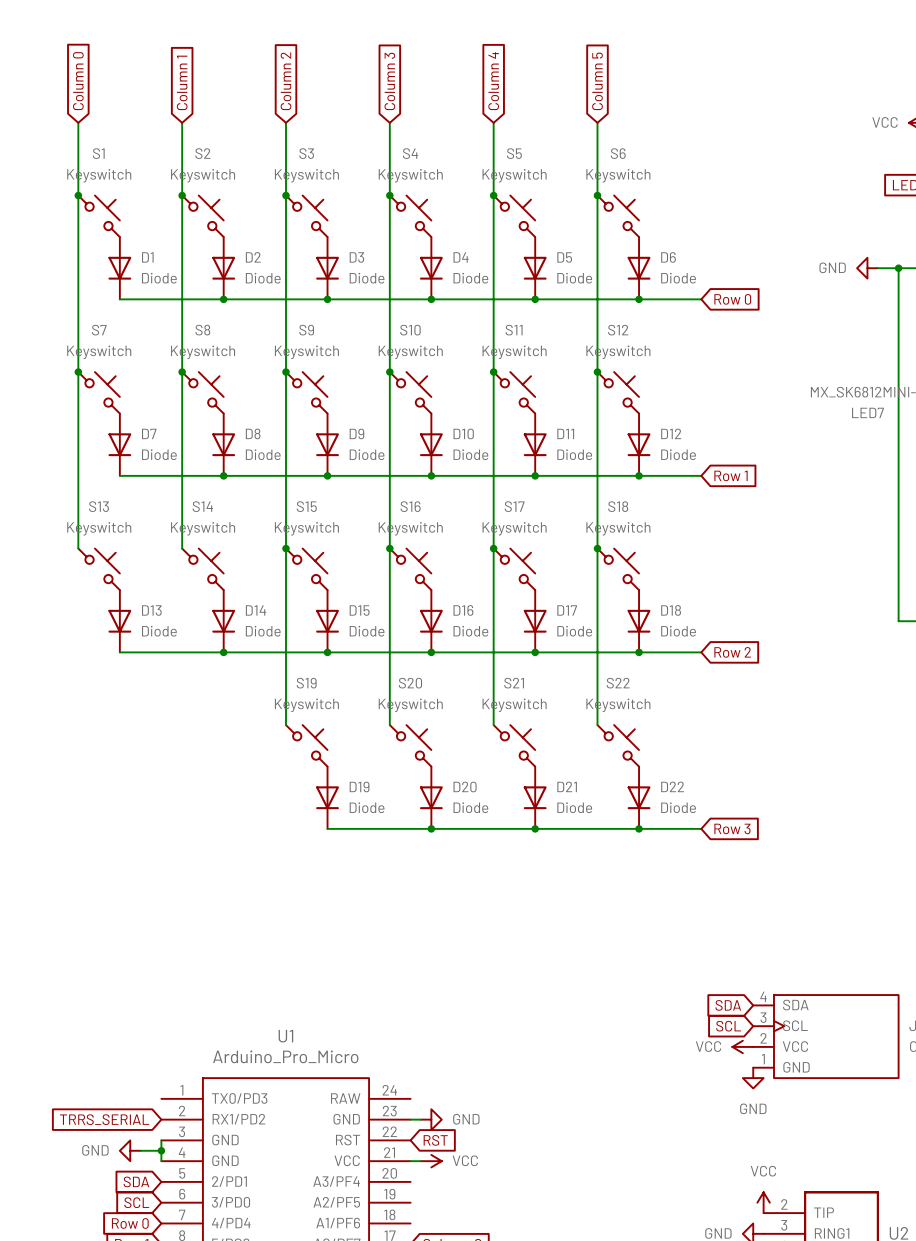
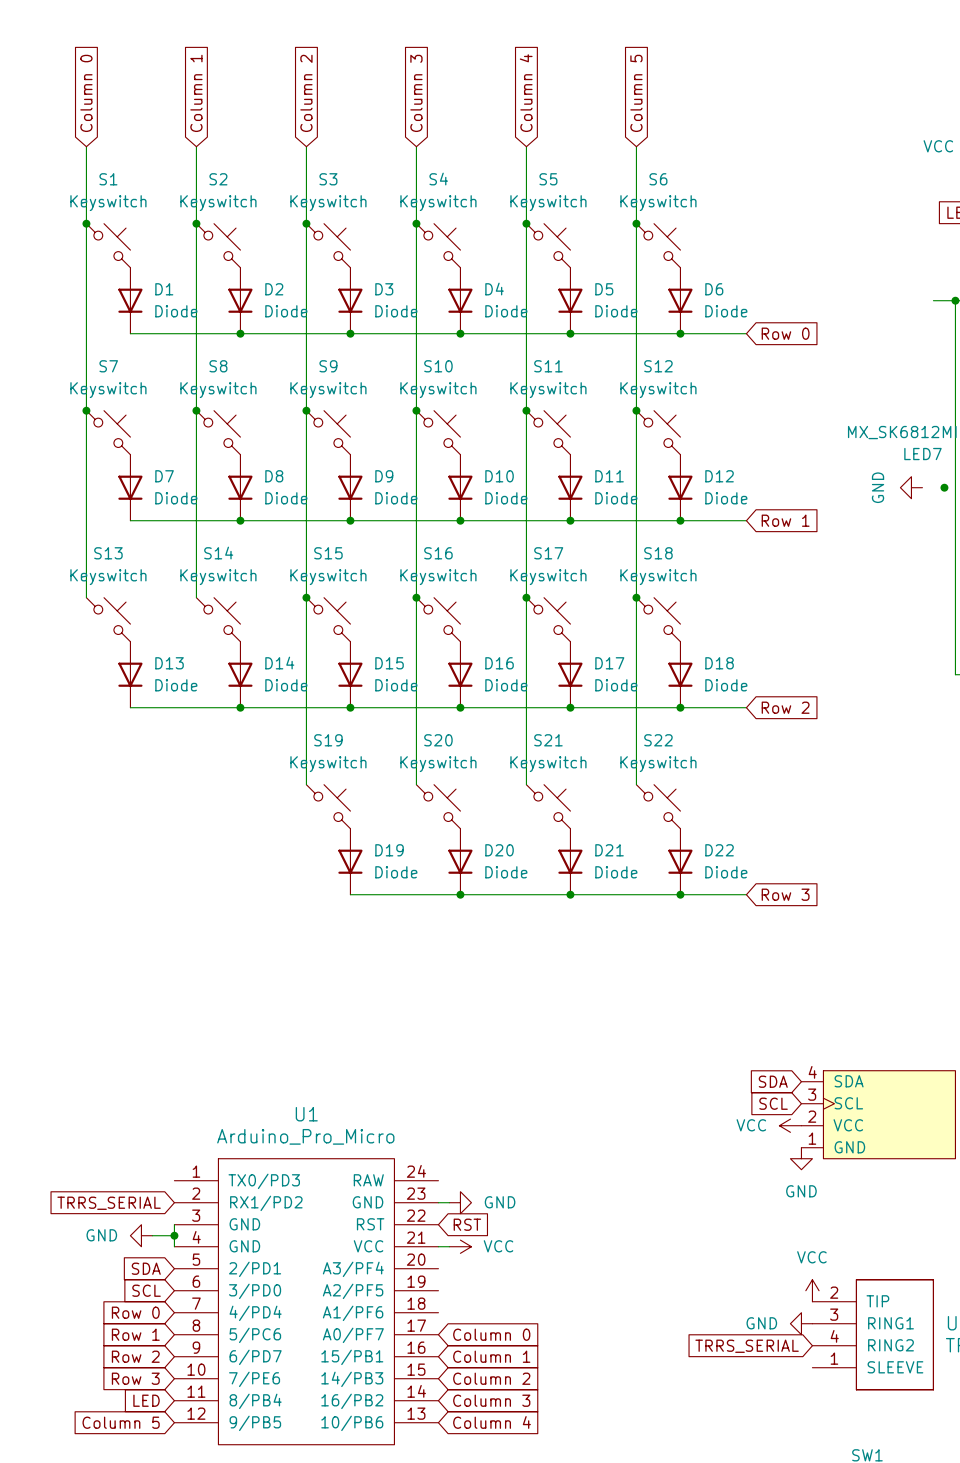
power symbol text rotation: 0° (832, 267) -> 90° counterclockwise (878, 487)
power symbol position: GND (867, 268) -> GND (911, 487)
junction: none -> (944, 487)

